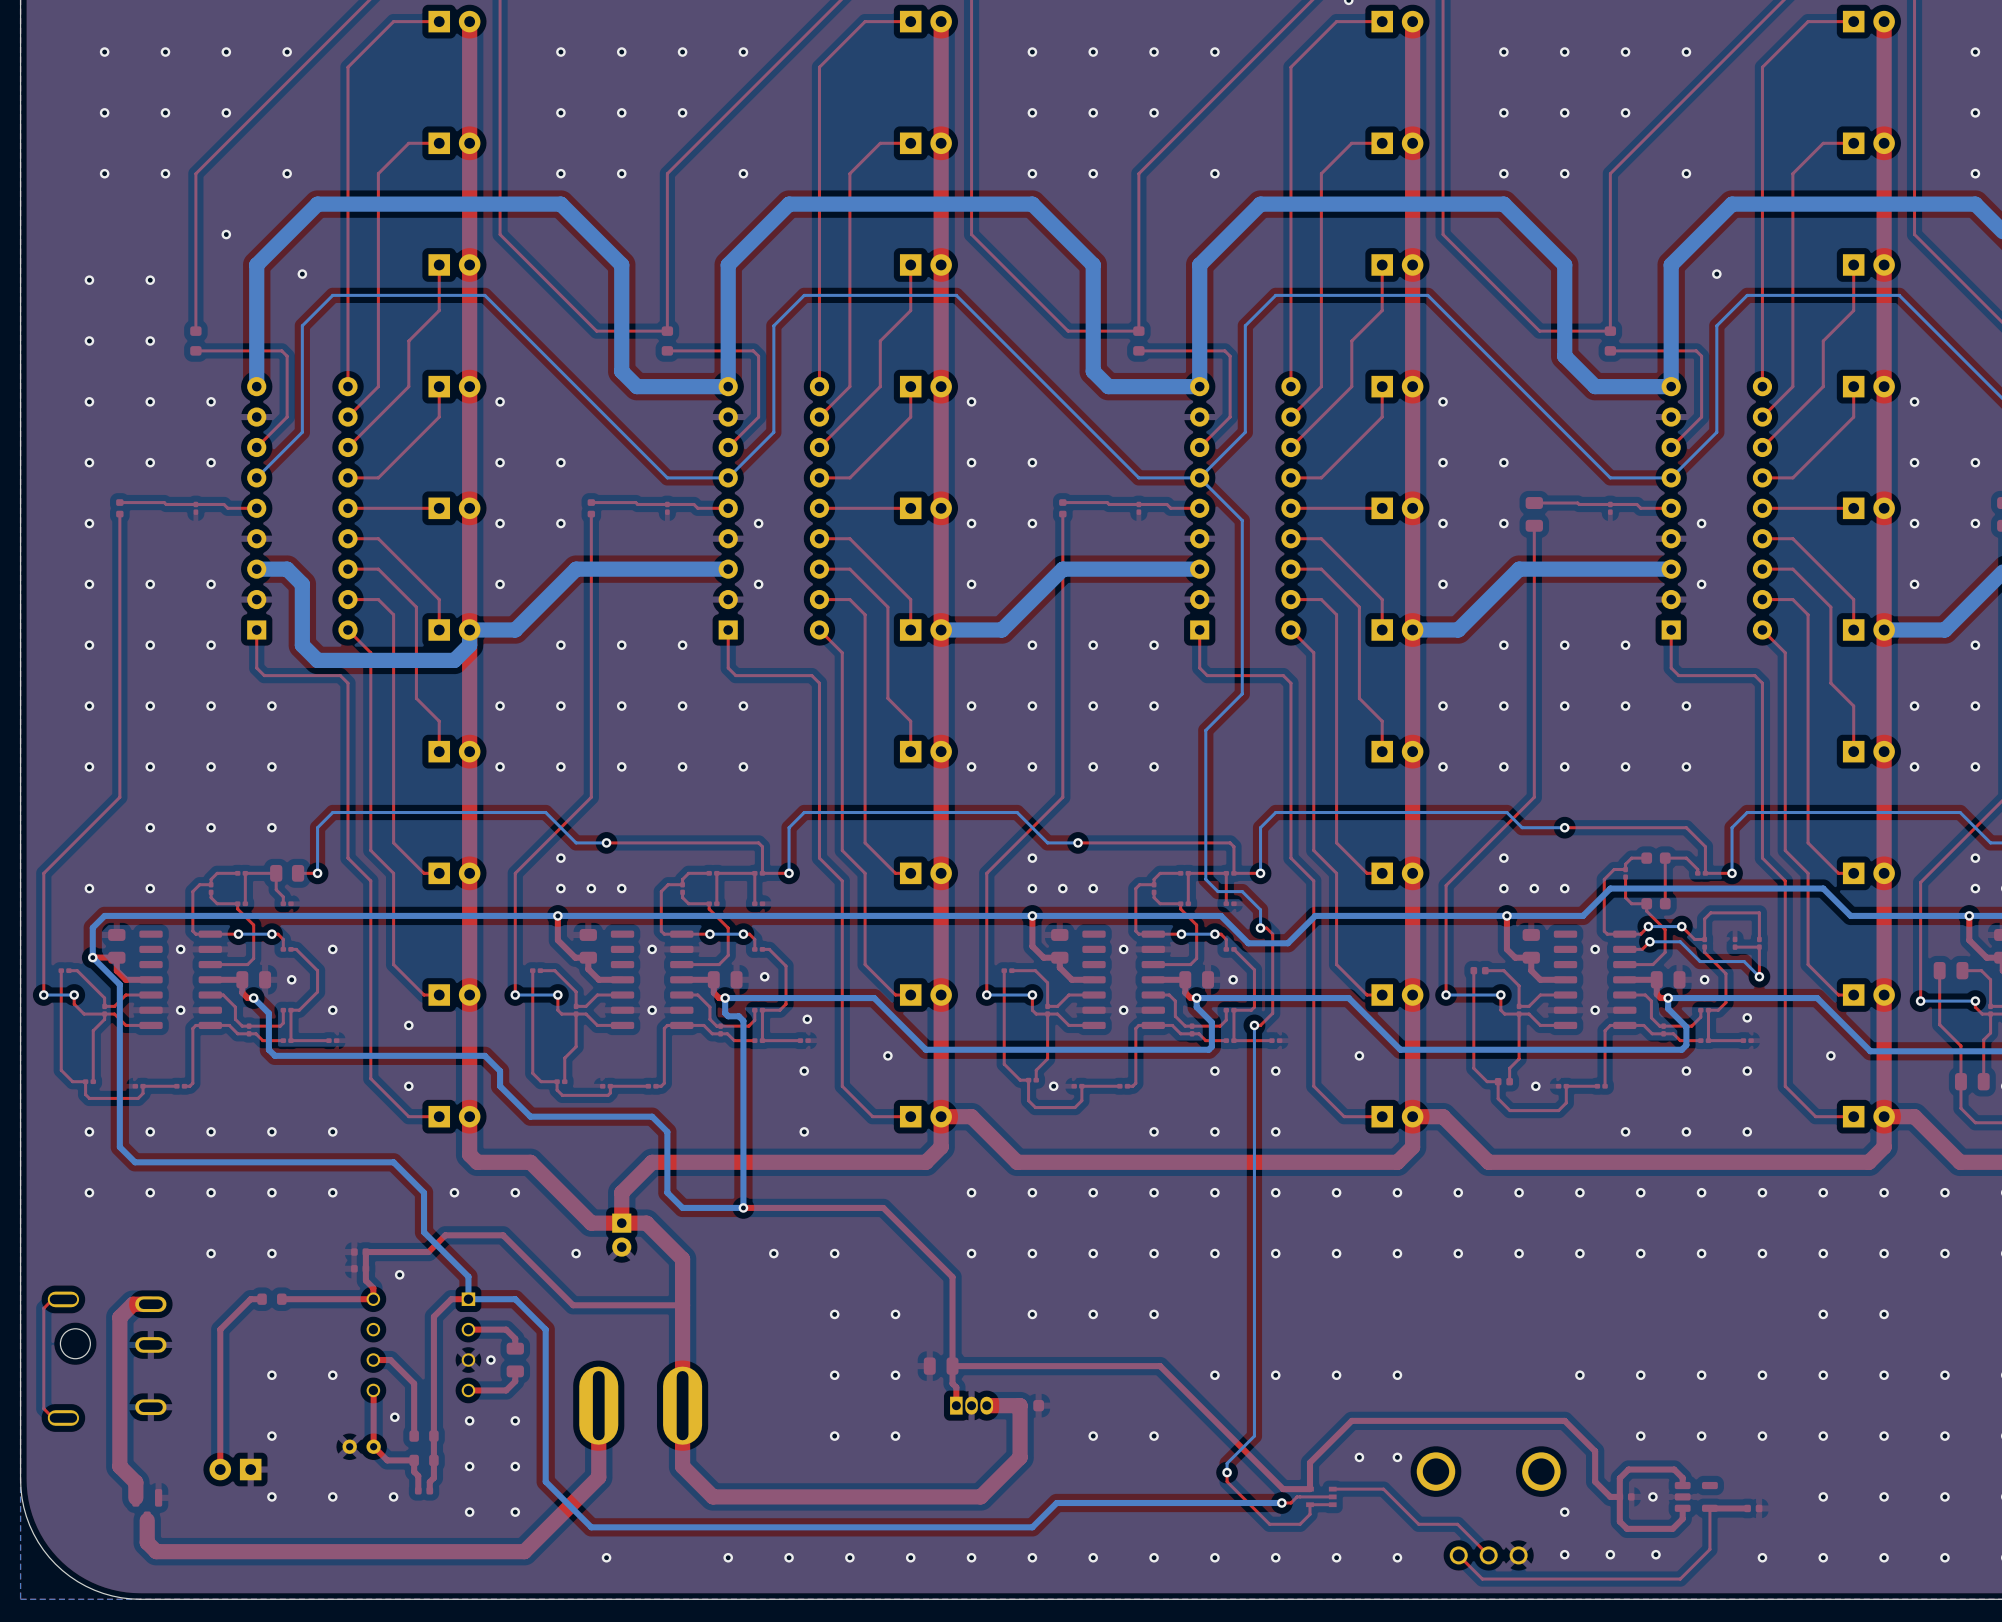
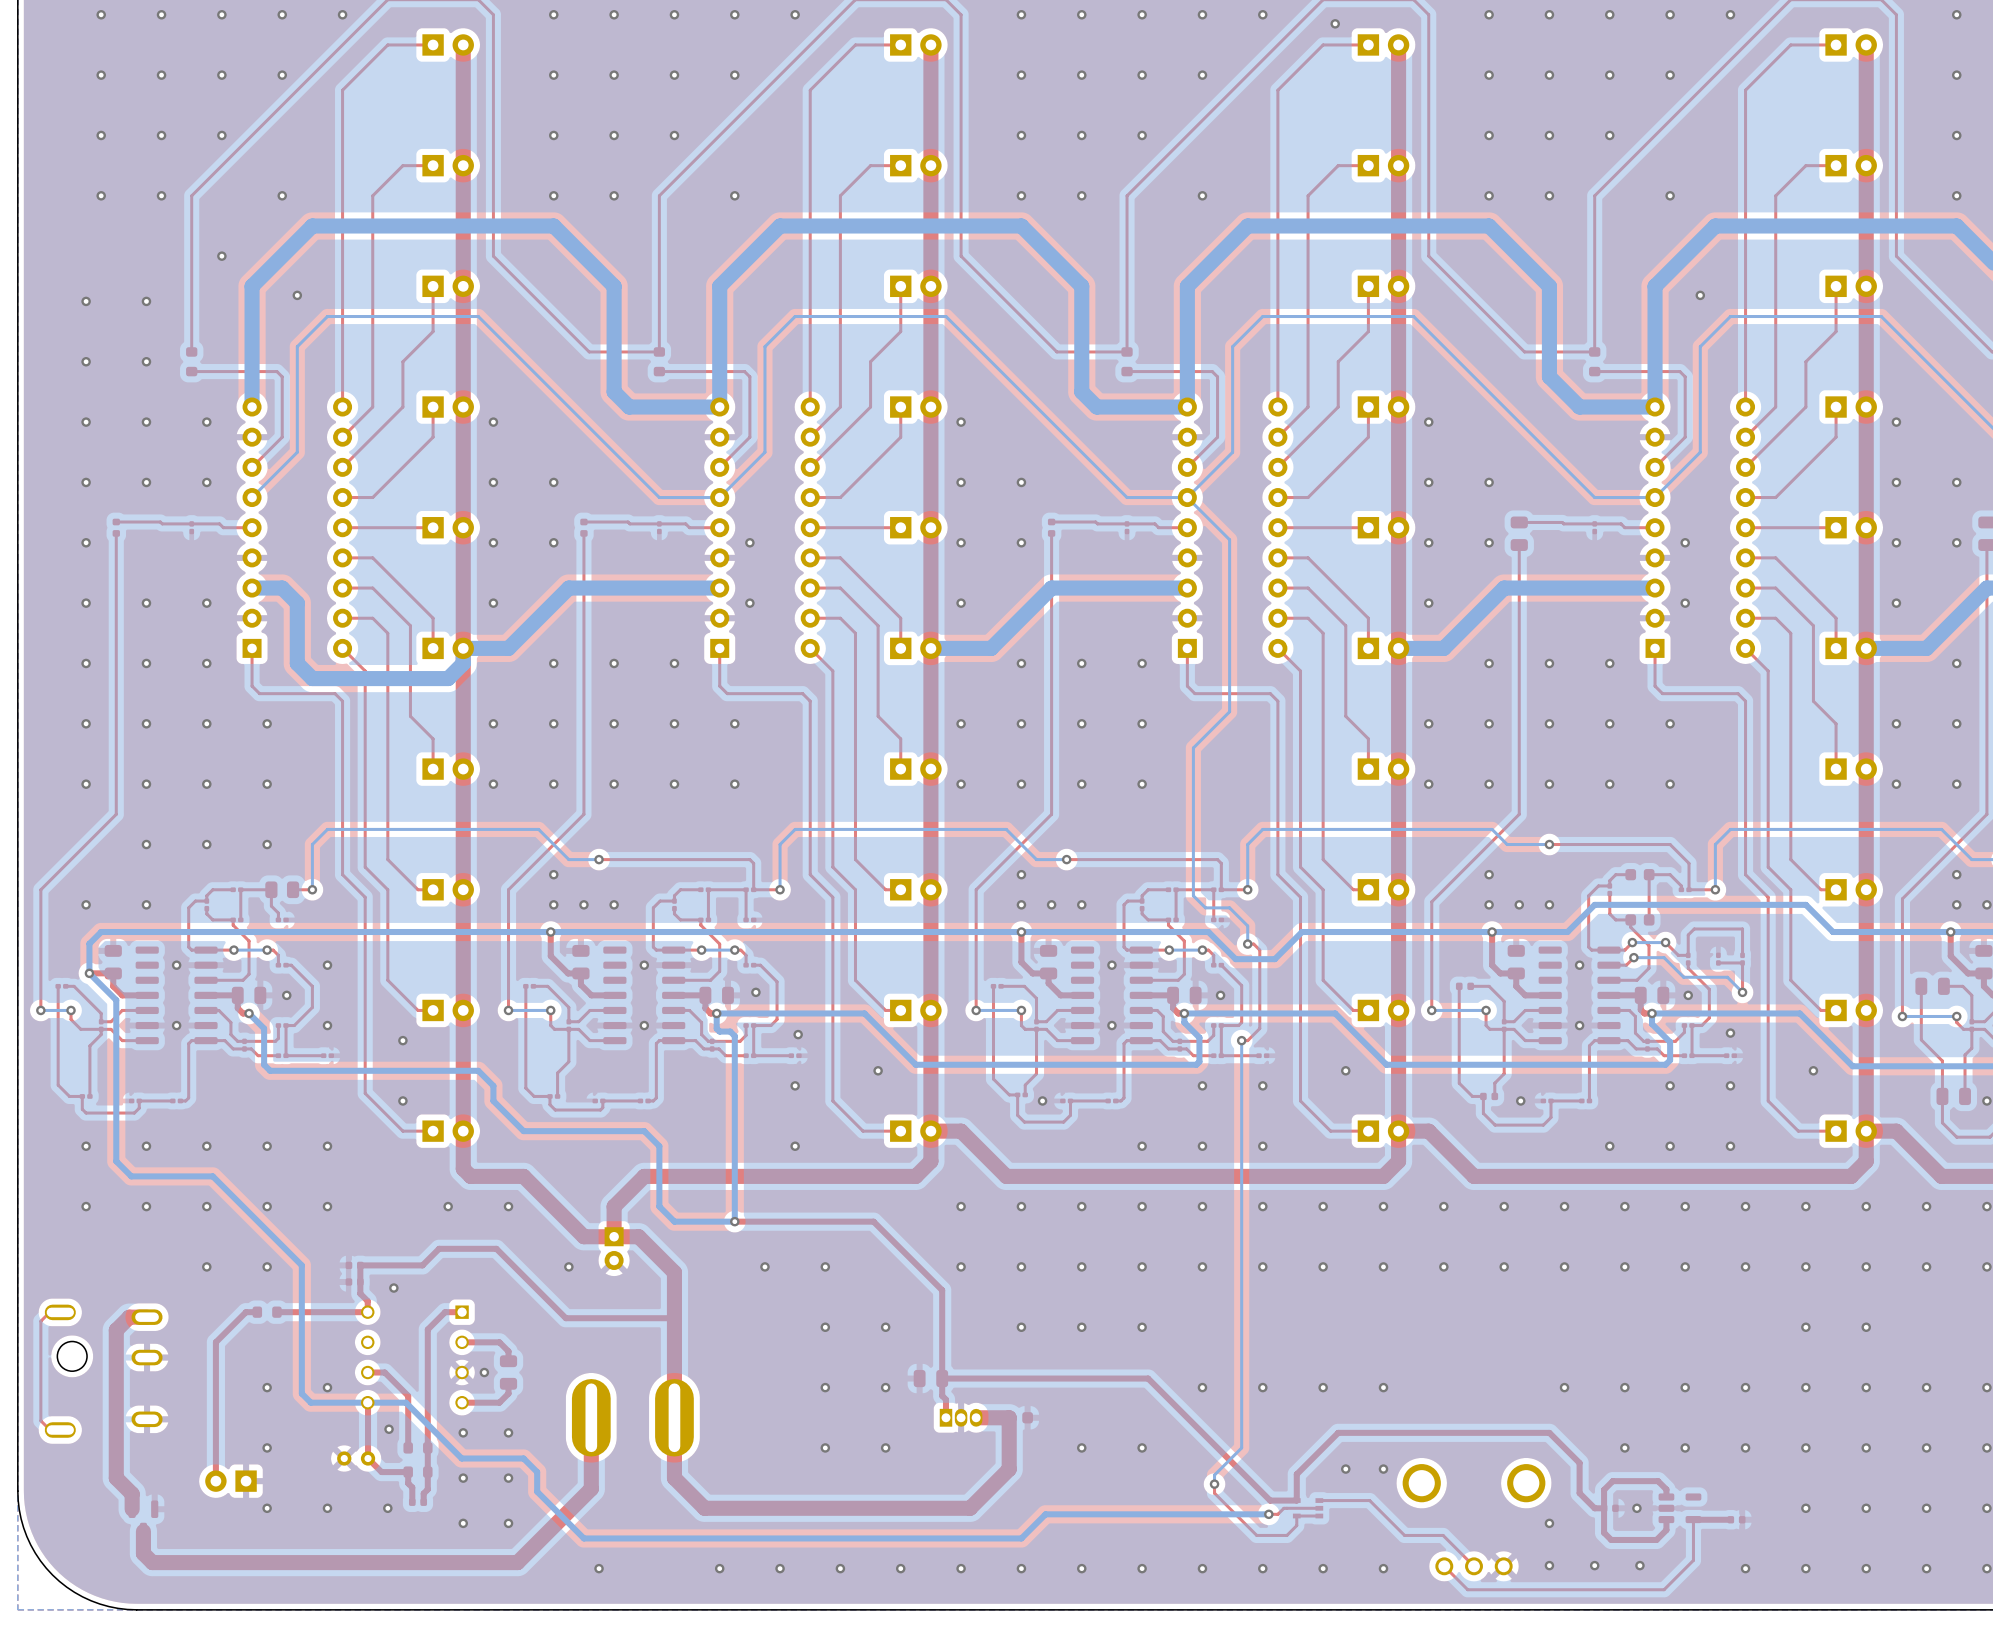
bottom track: (217, 1162) (393, 1162) (424, 1192) (424, 1232) (468, 1276) (468, 1299) (515, 1299) (545, 1329) (545, 1481) -> (212, 1176) (301, 1265) (301, 1393) (310, 1402) (405, 1402) (461, 1458) (523, 1458) (537, 1472) (538, 1493)

